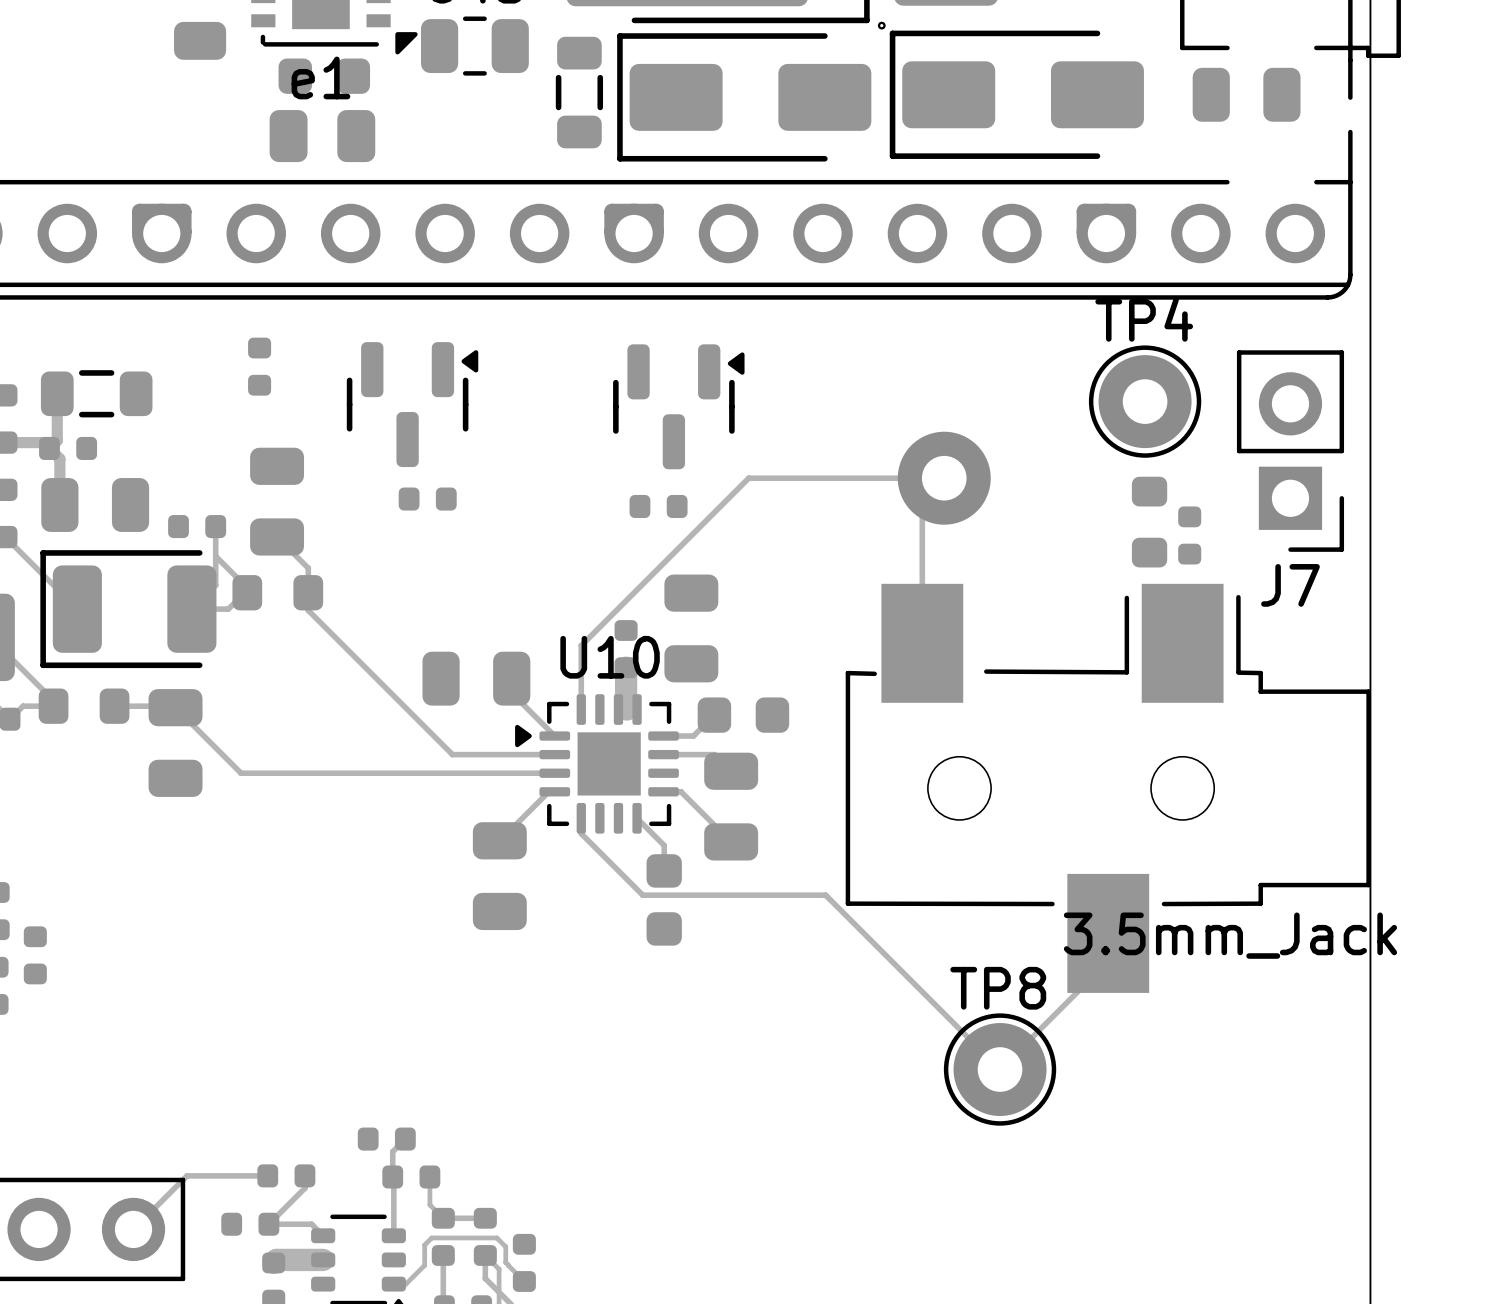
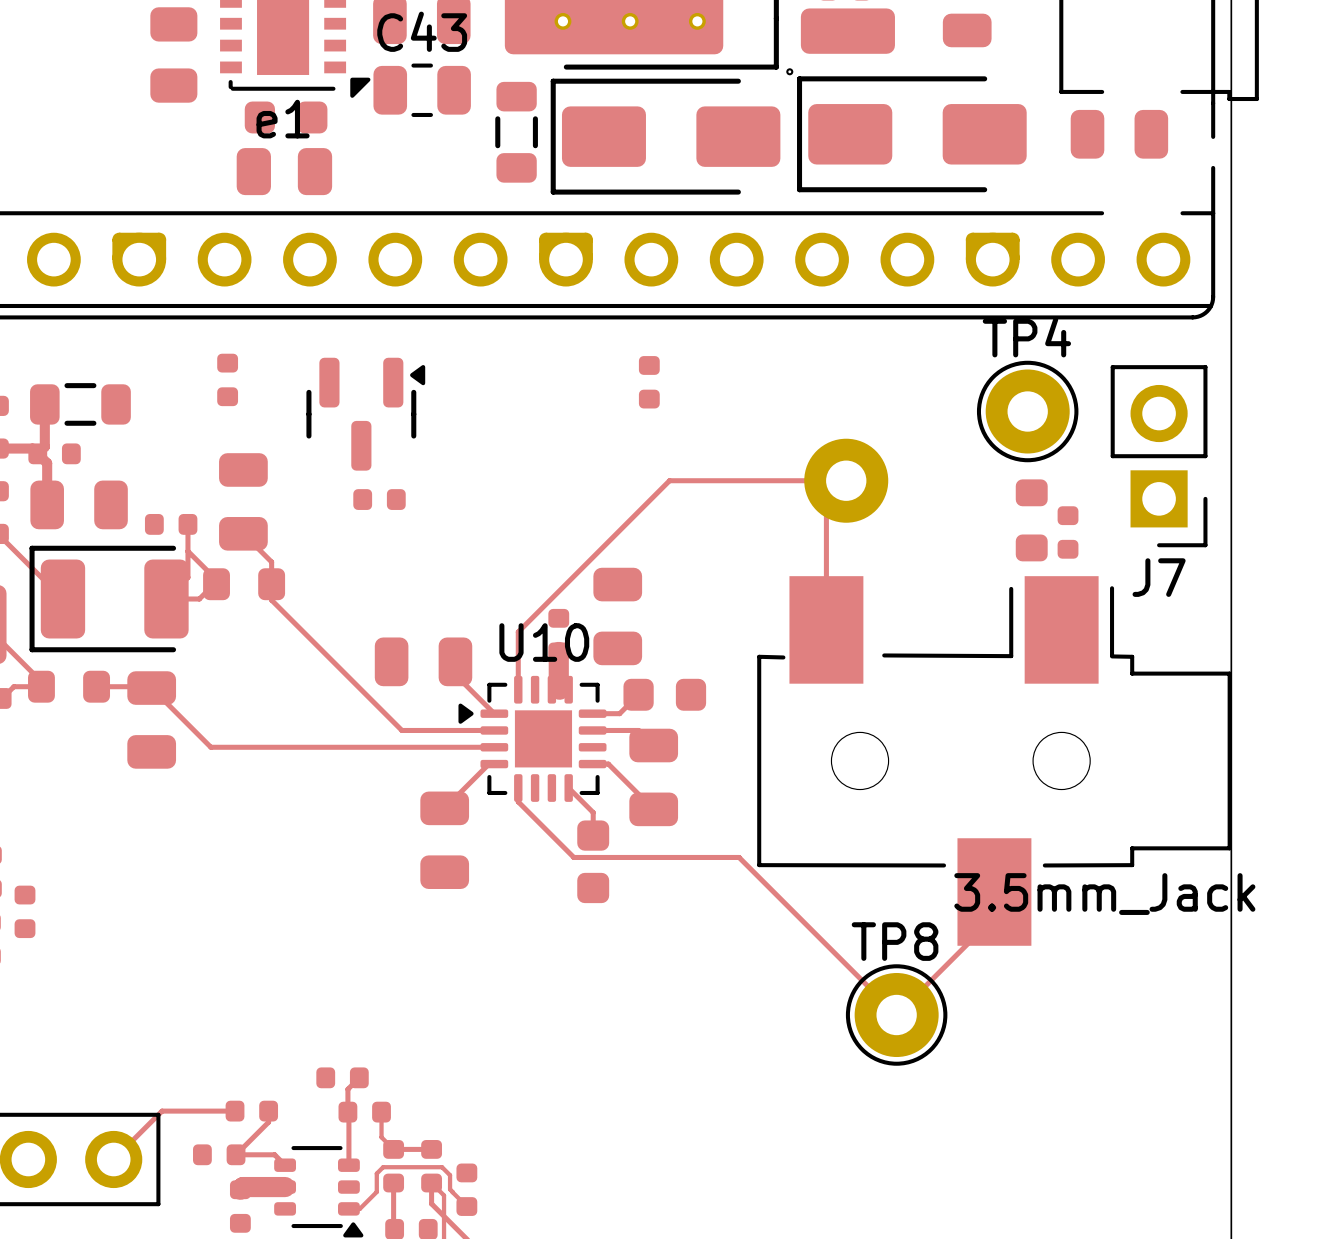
part: (678, 406) -> none
part rotation: 0° (658, 506) -> 90° clockwise (649, 382)
part position: (658, 506) -> (649, 382)

